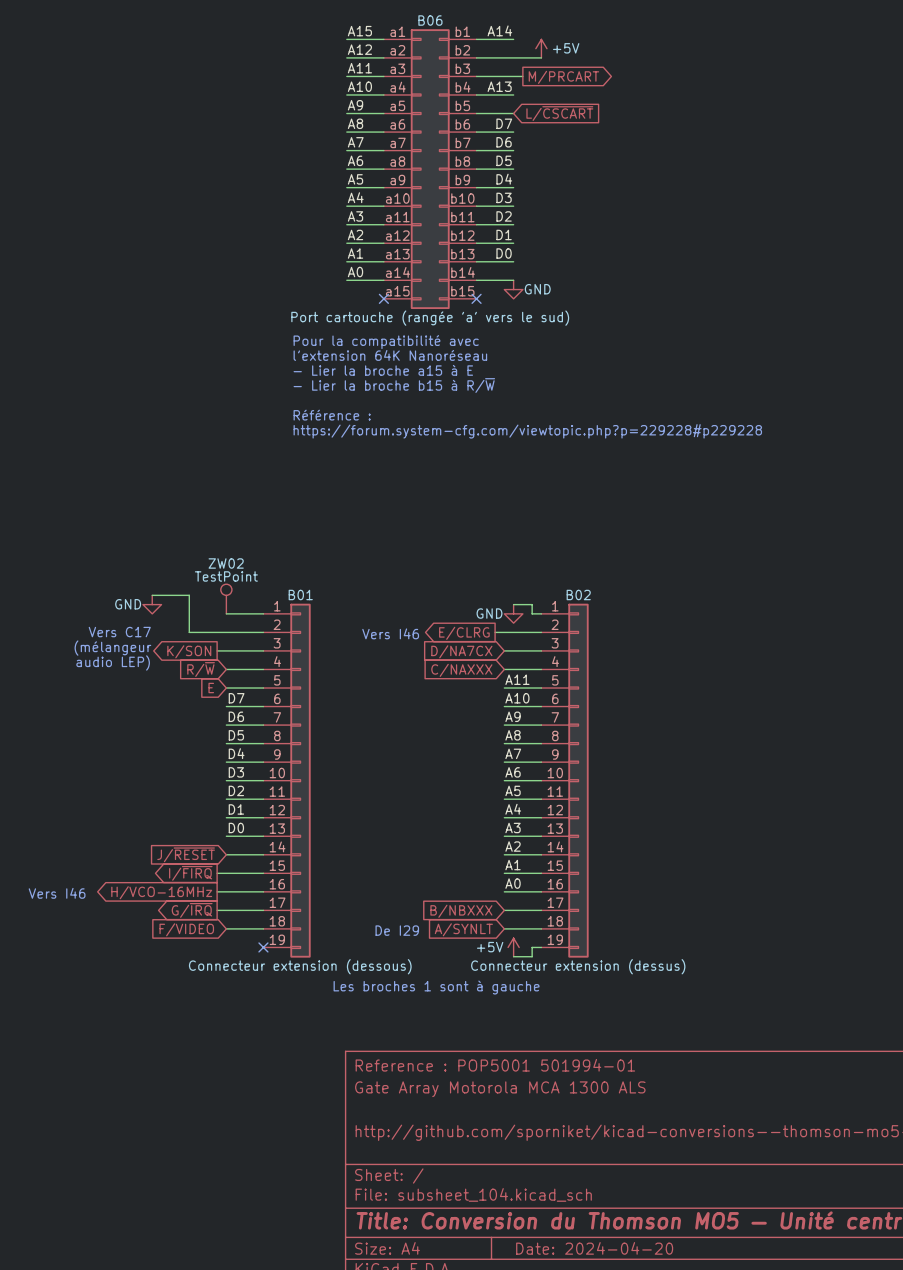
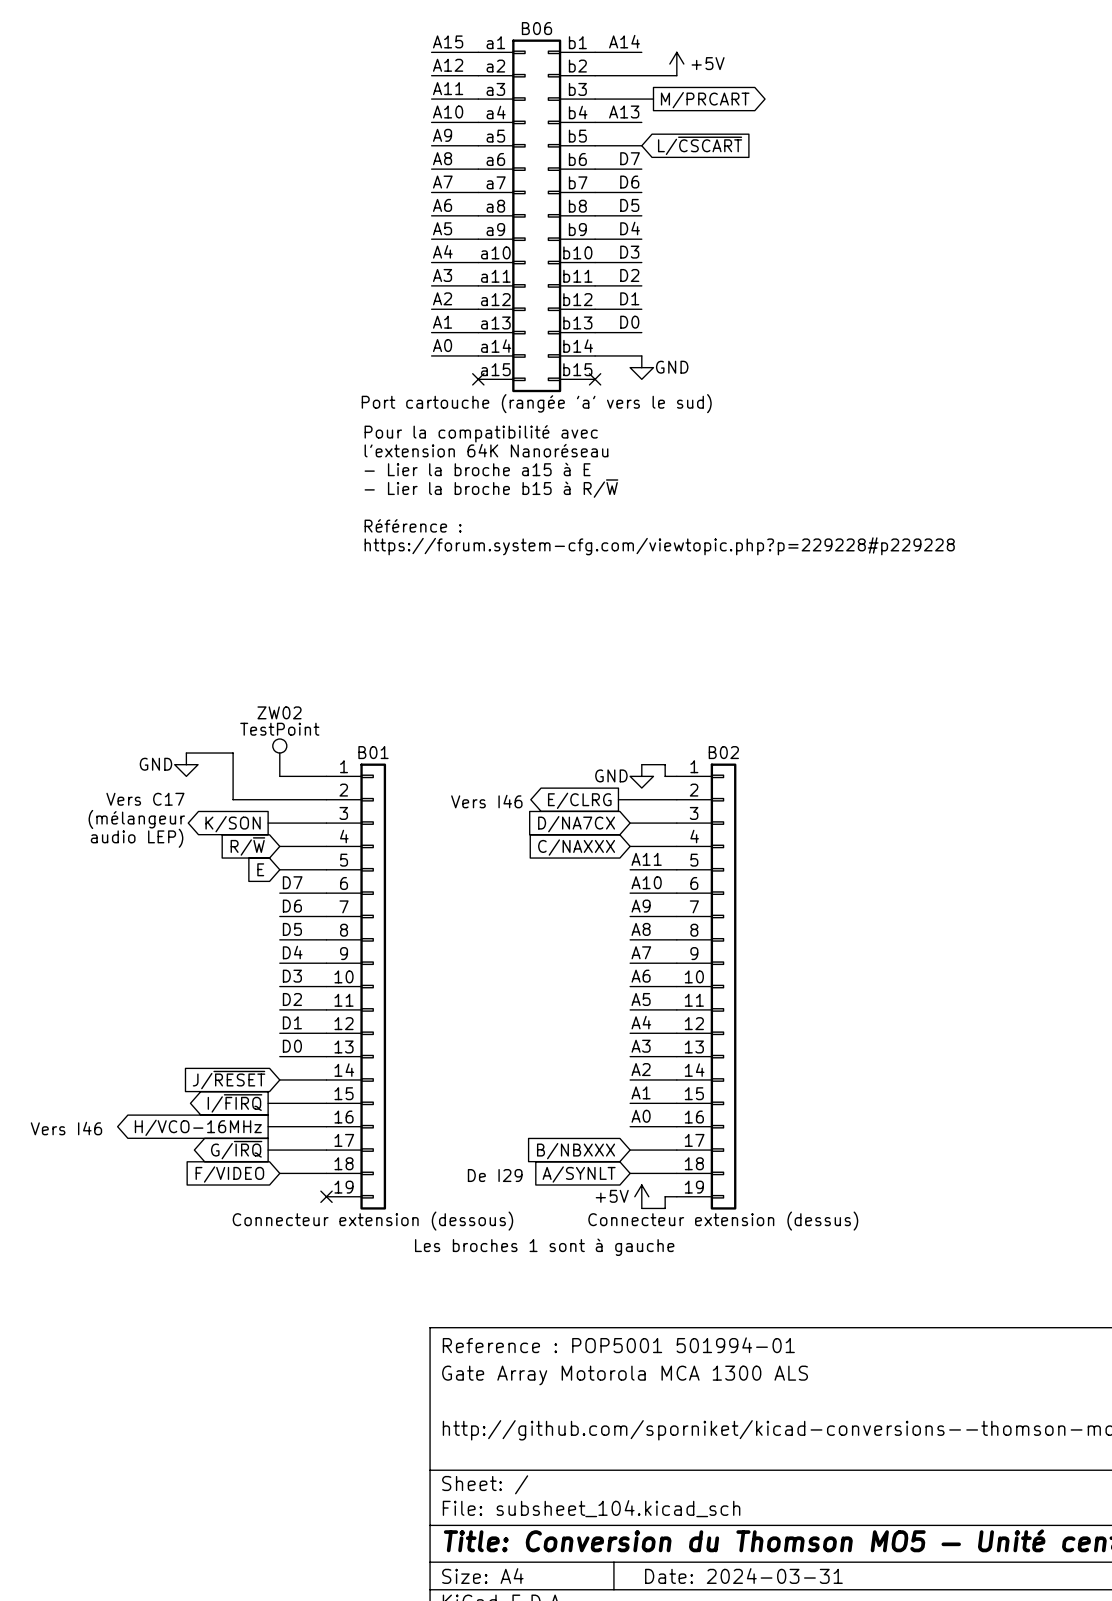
title block: Date: 2024-04-20 (594, 1248) -> Date: 2024-03-31 (743, 1576)

